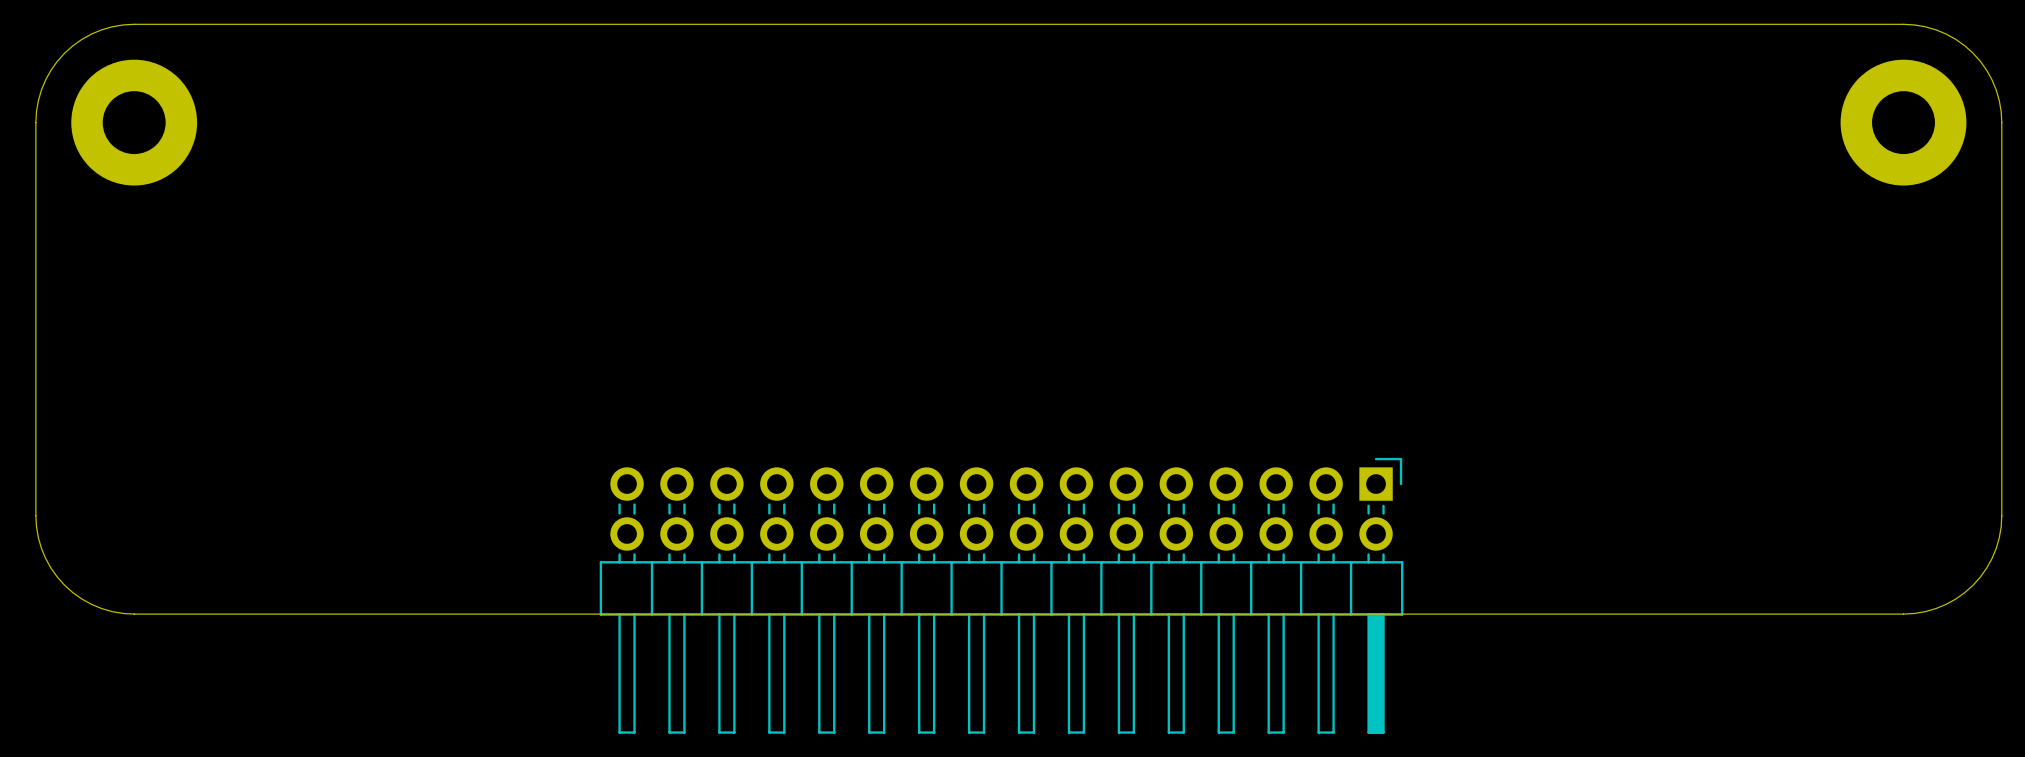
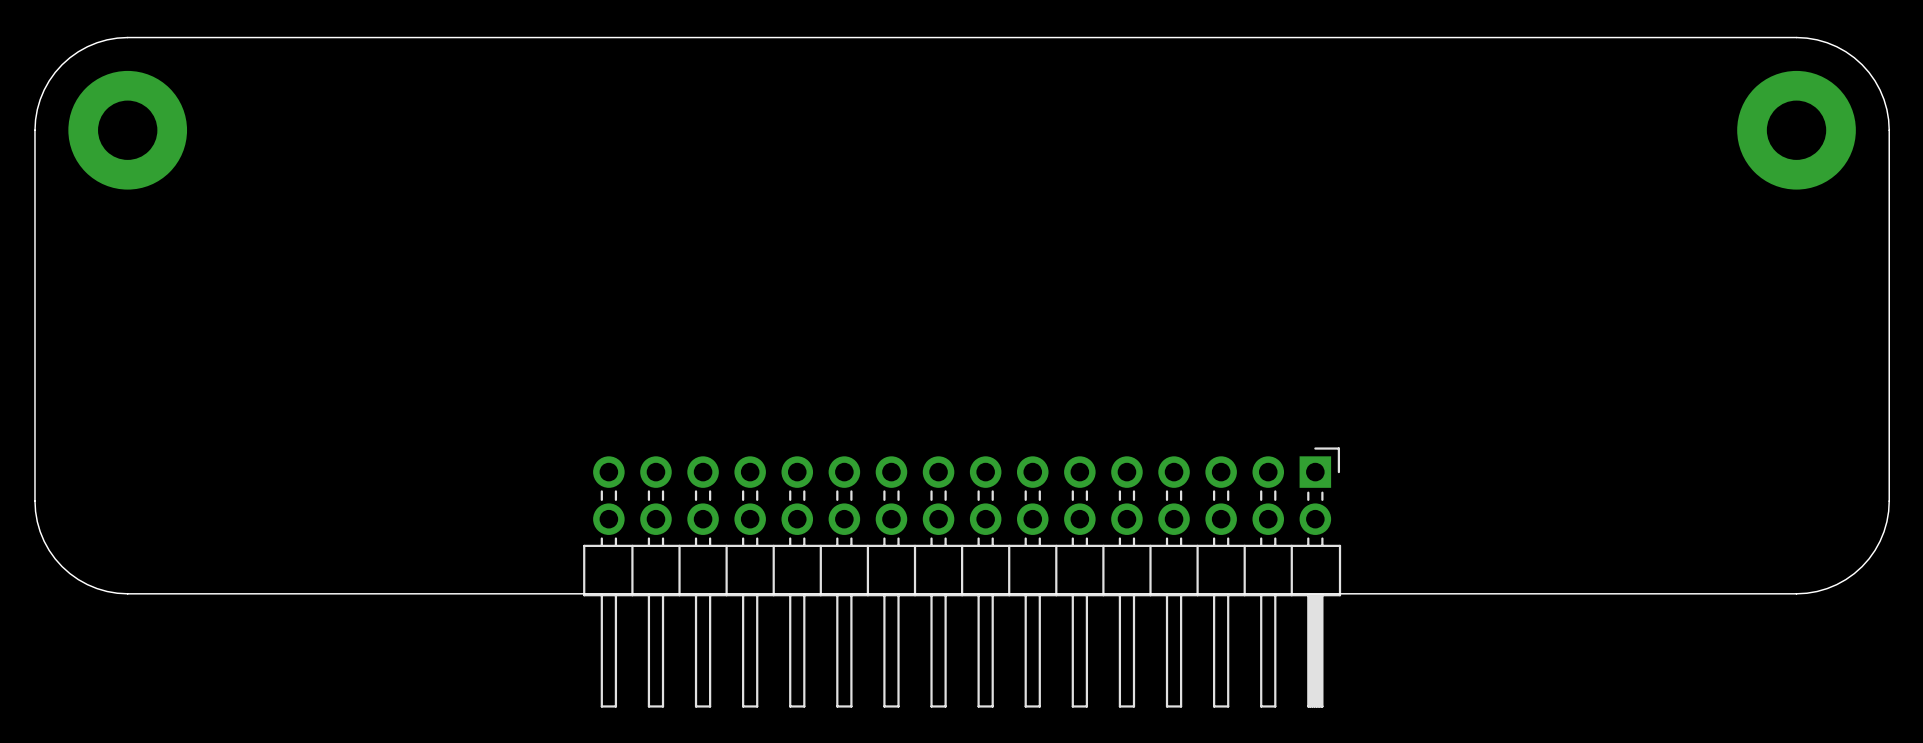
part position: (1001, 595) -> (962, 577)

